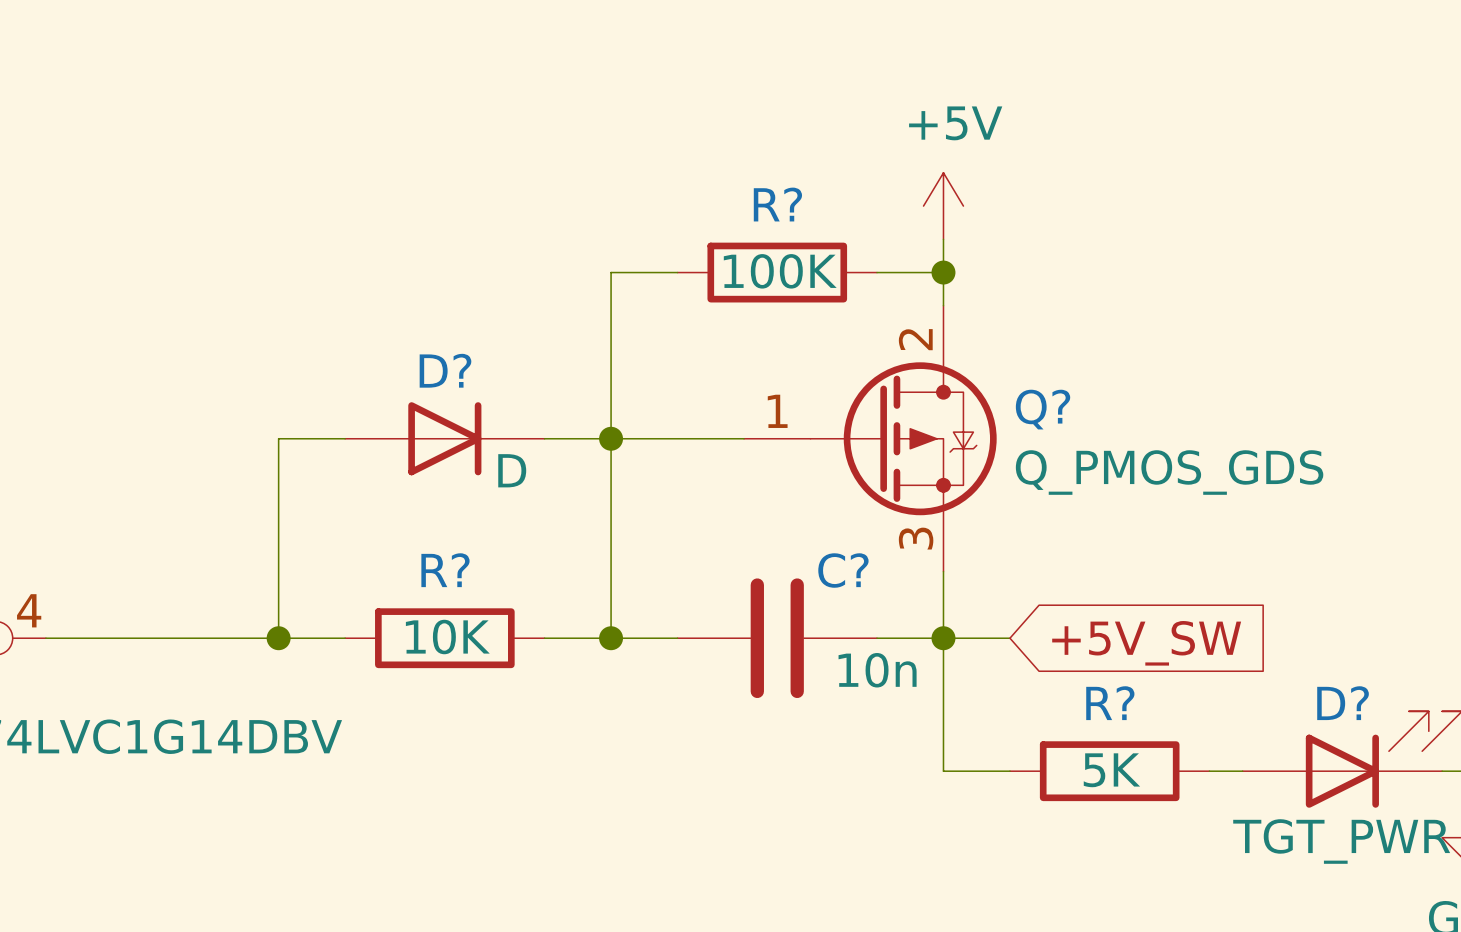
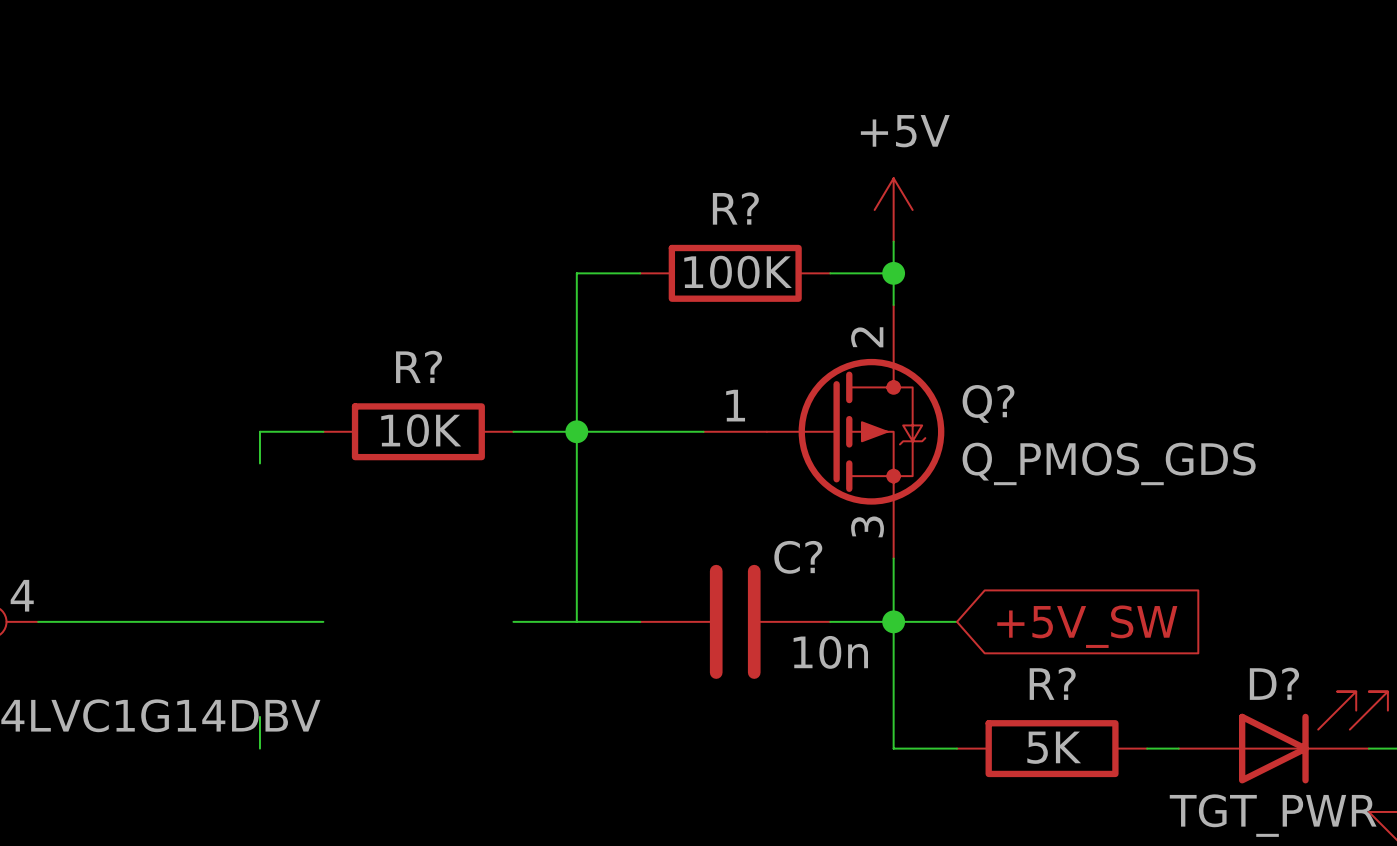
D?: D (444, 438) -> none
wire: (278, 472) (278, 638) -> none
junction: (278, 638) -> none
R? position: (444, 638) -> (418, 431)
junction: (611, 638) -> none
wire: none -> (259, 716) (259, 748)

